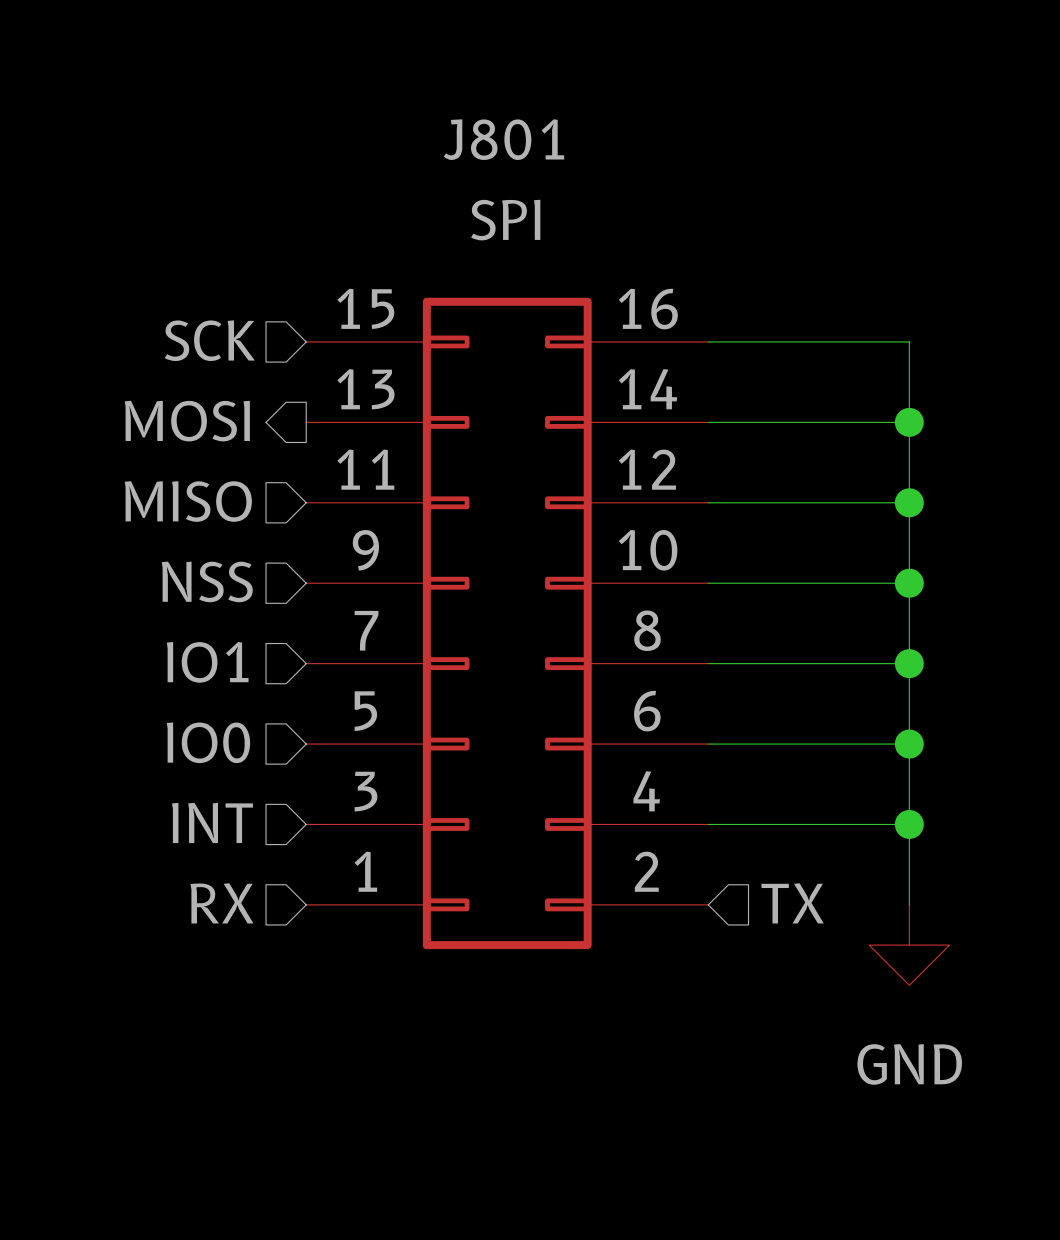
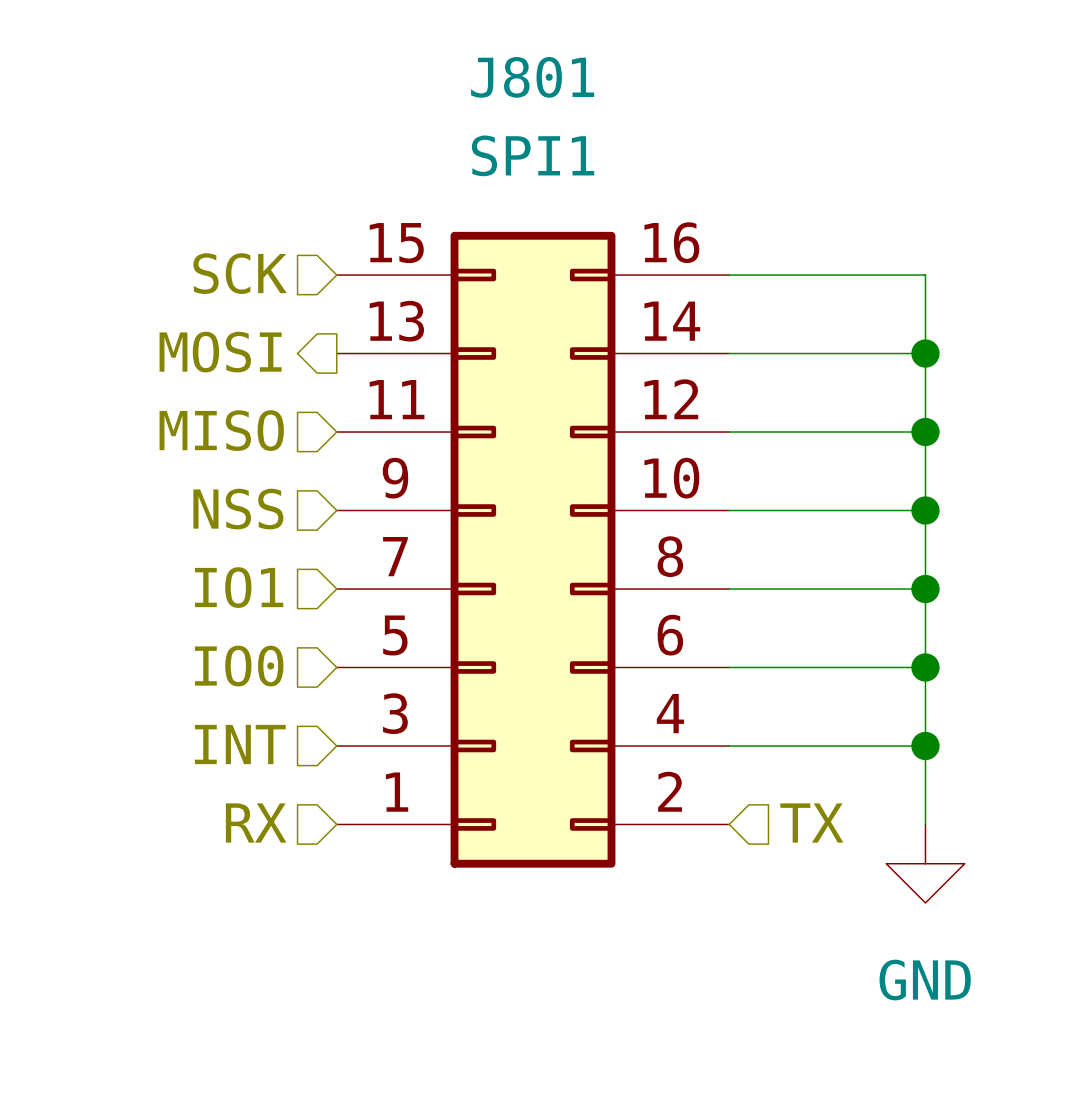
J801 value: SPI (505, 220) -> SPI1 (533, 155)

